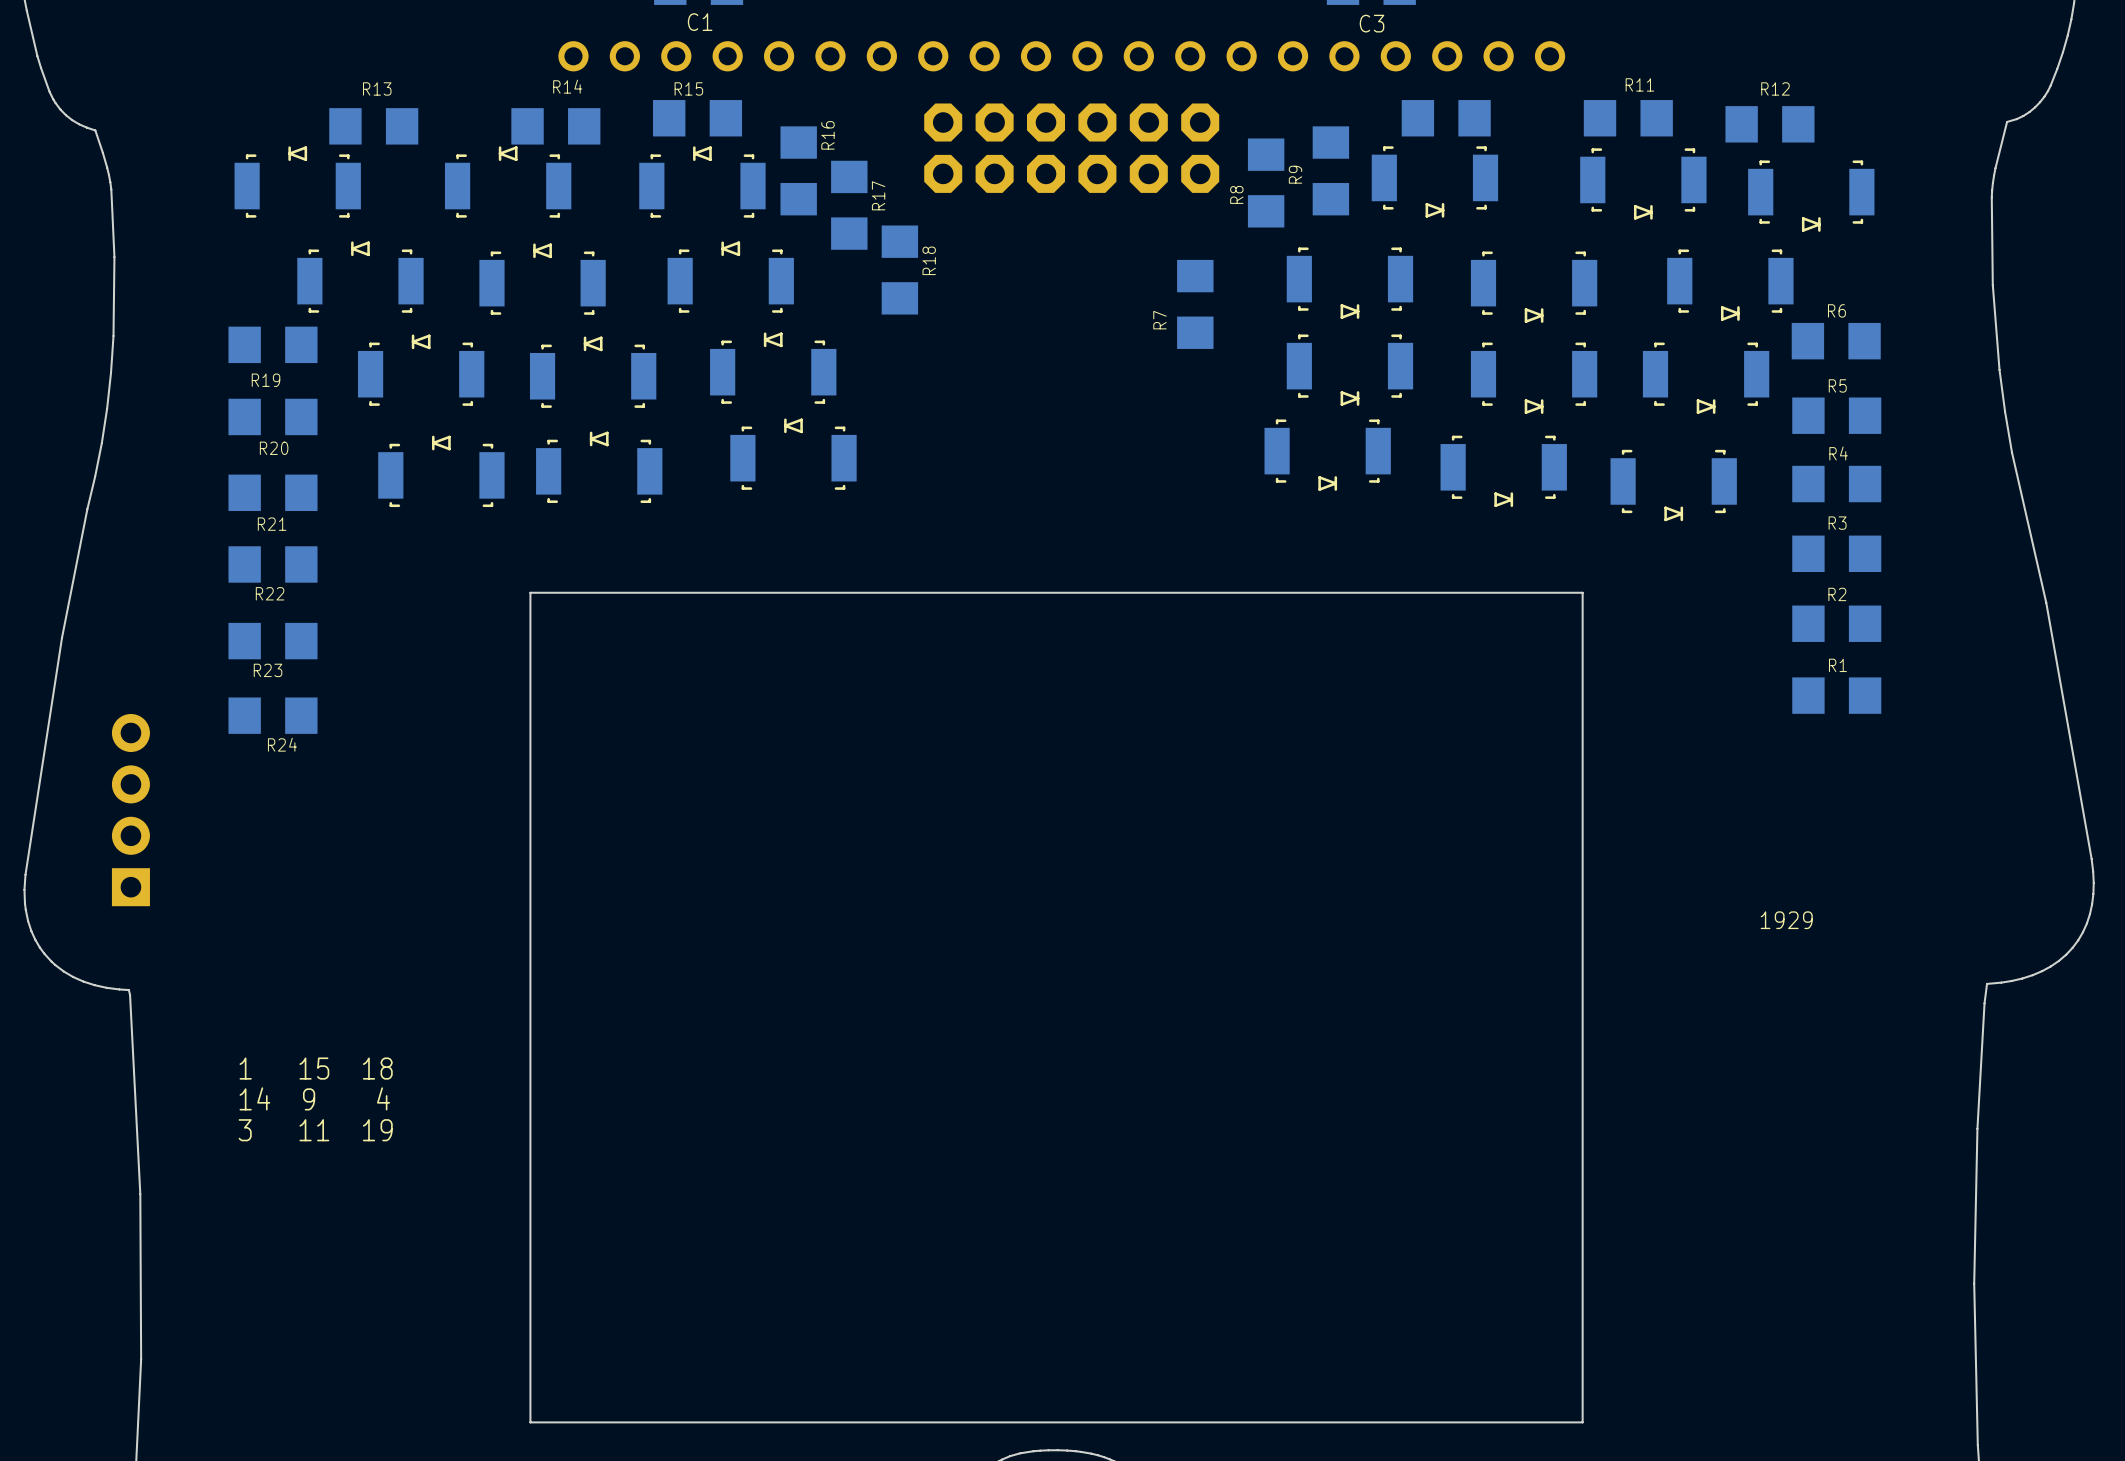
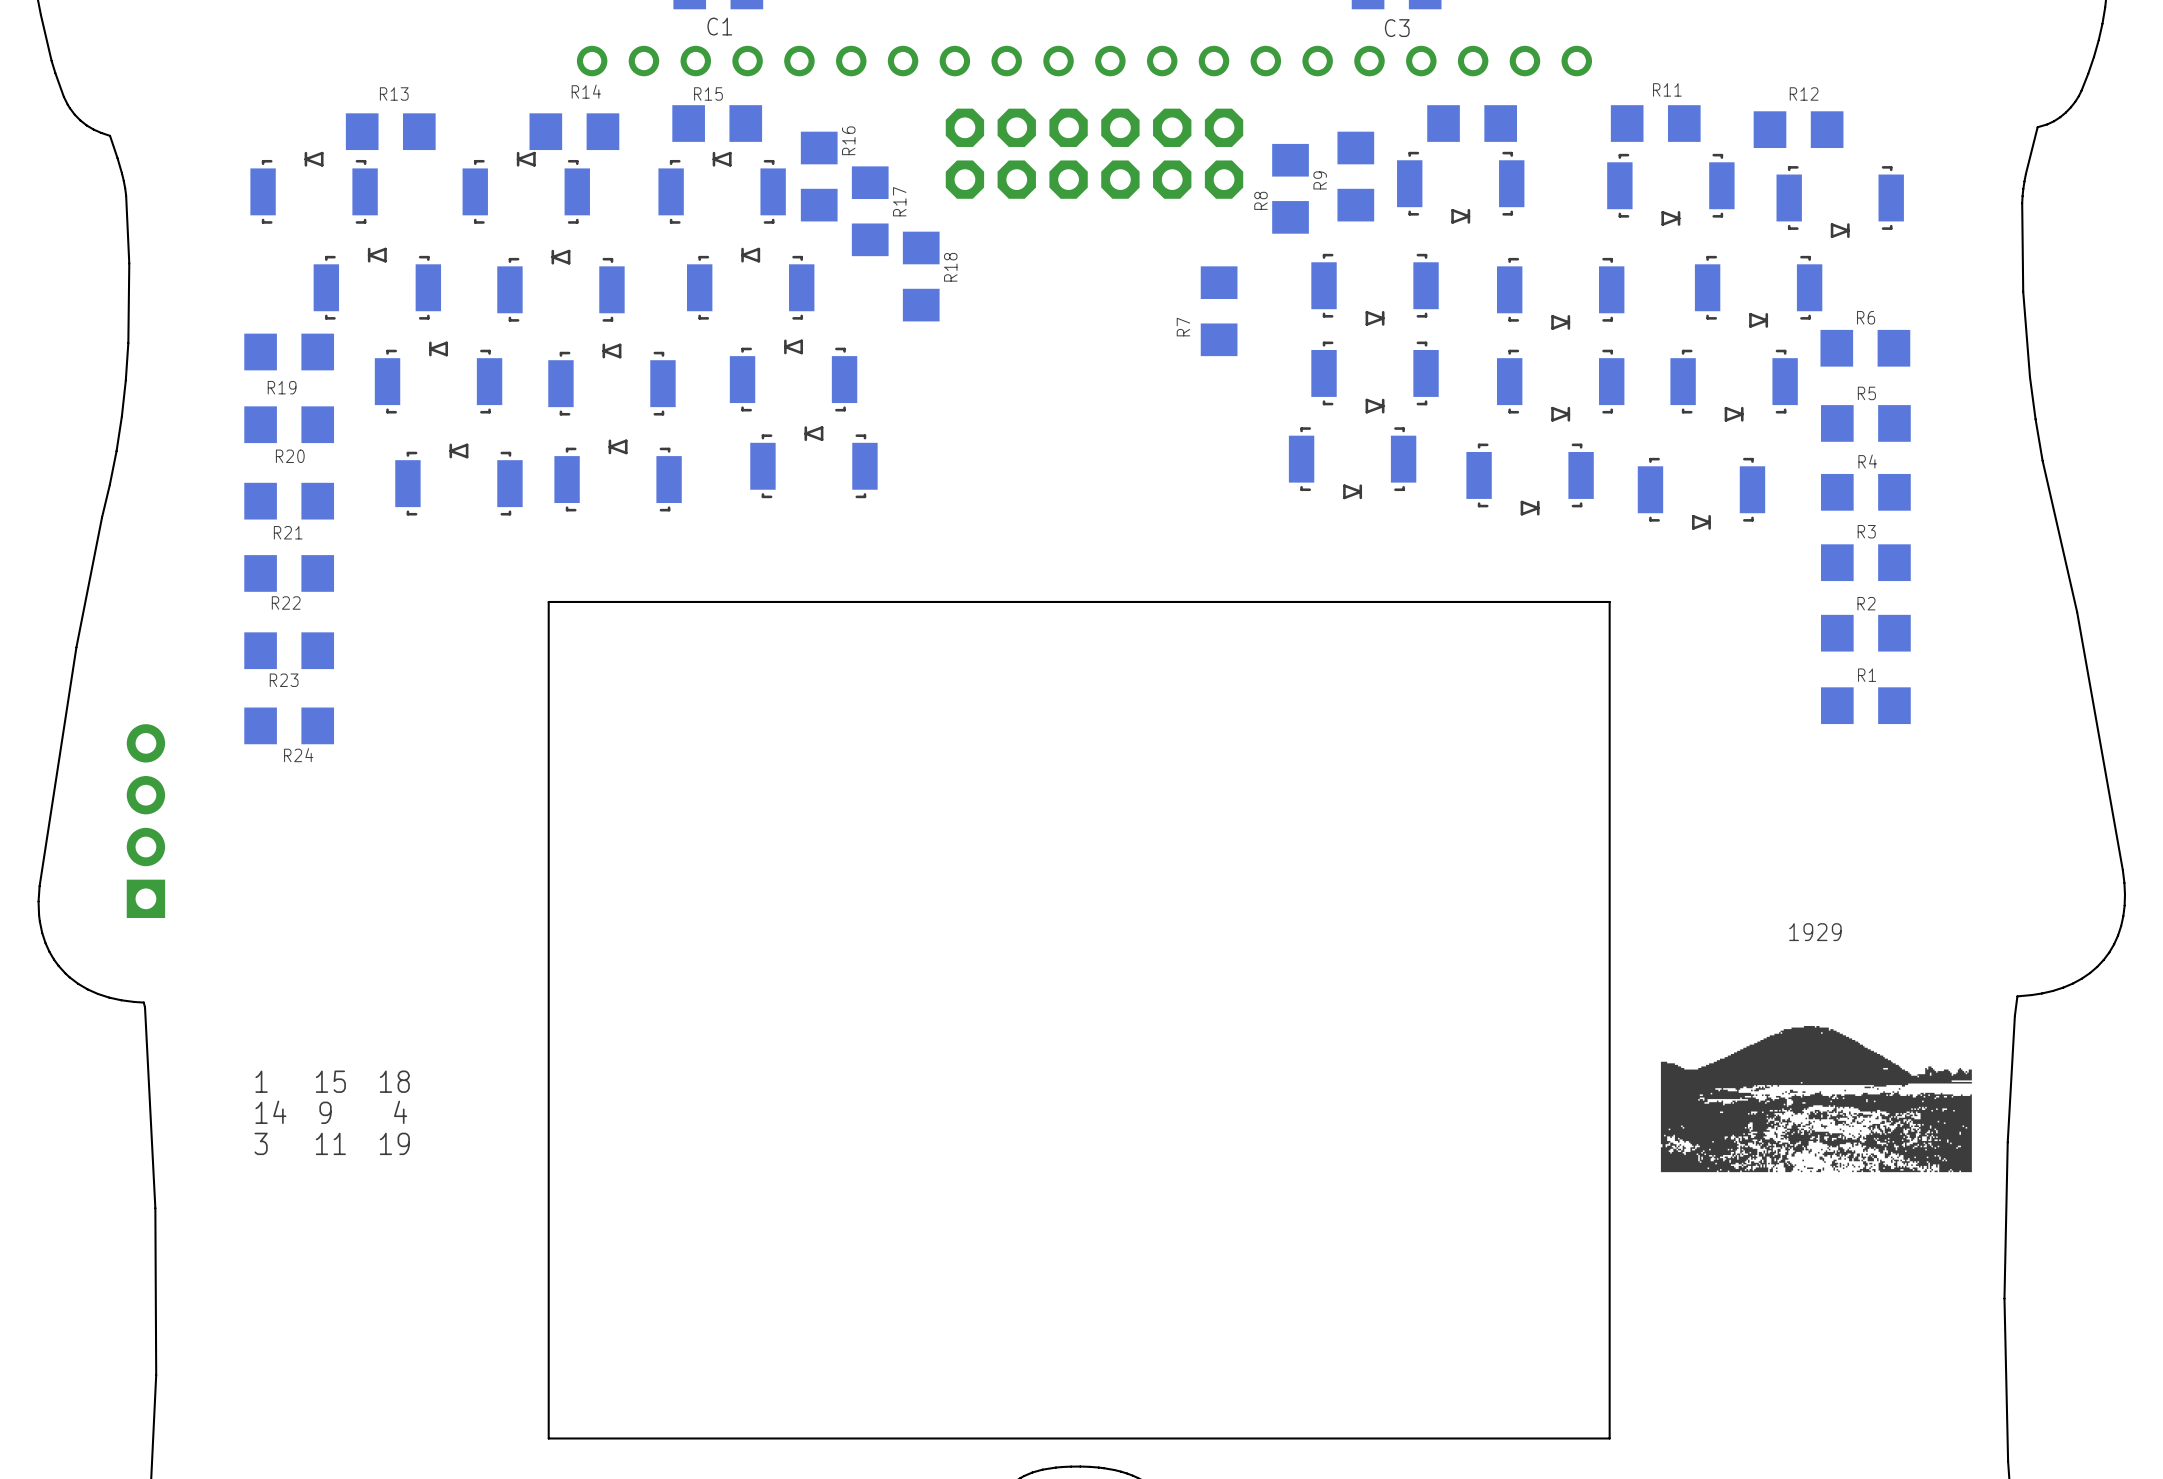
drawing: none -> [1660, 1025, 1972, 1173]

